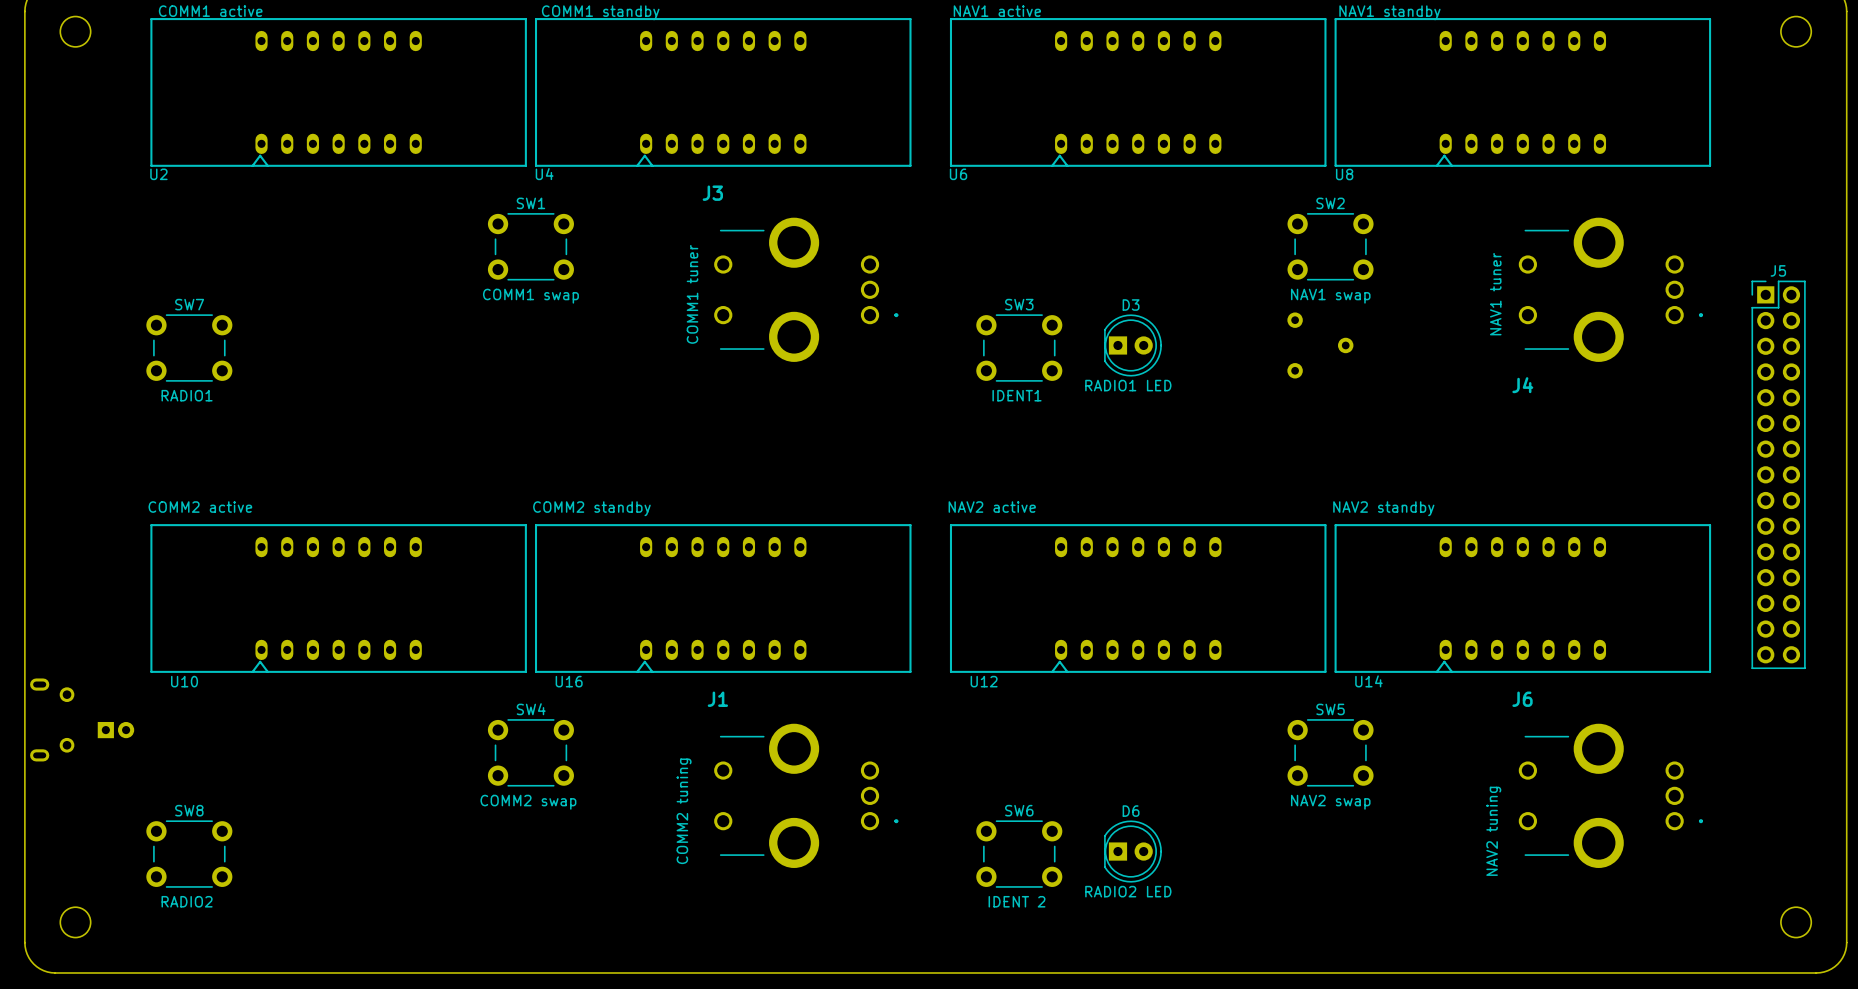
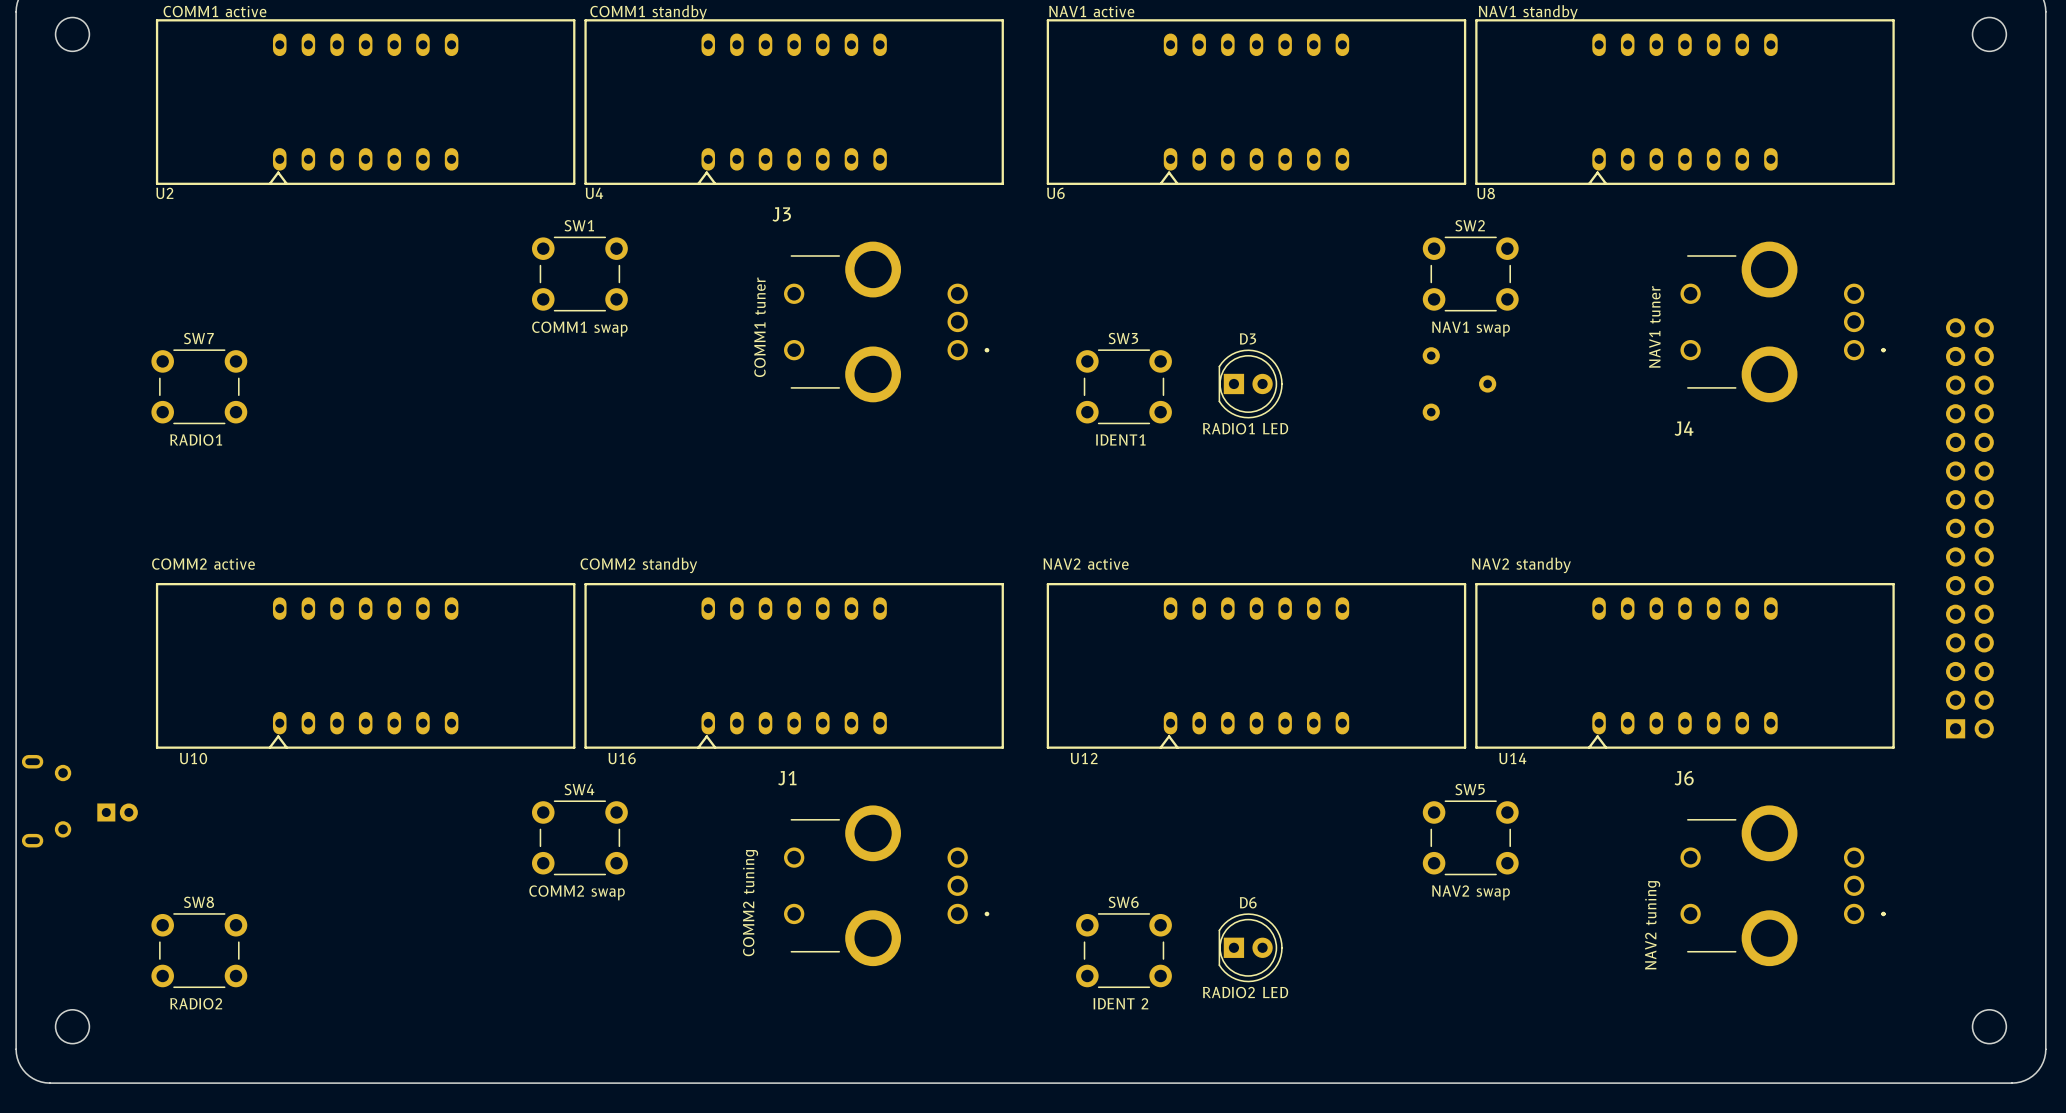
J5 side: top (1778, 474) -> bottom (1969, 528)

